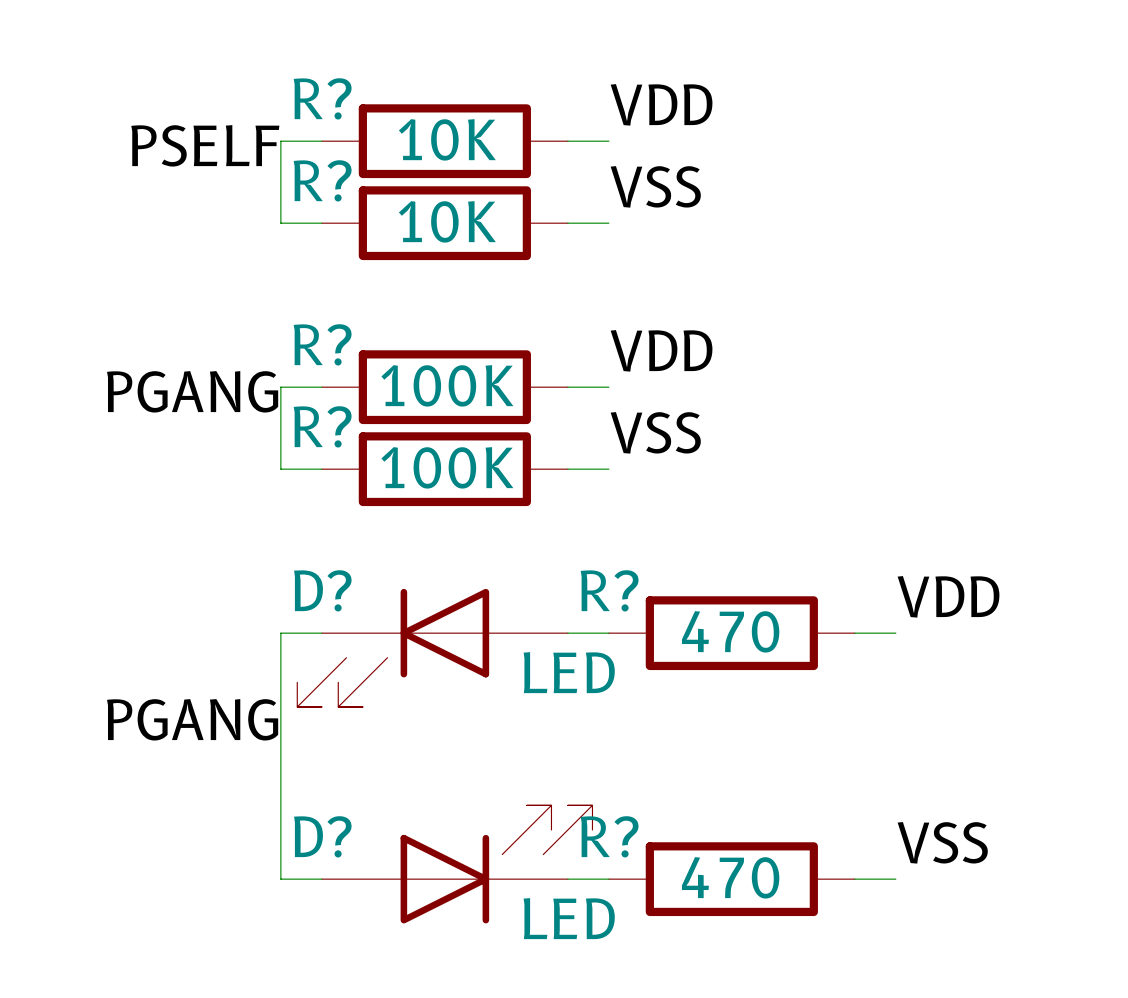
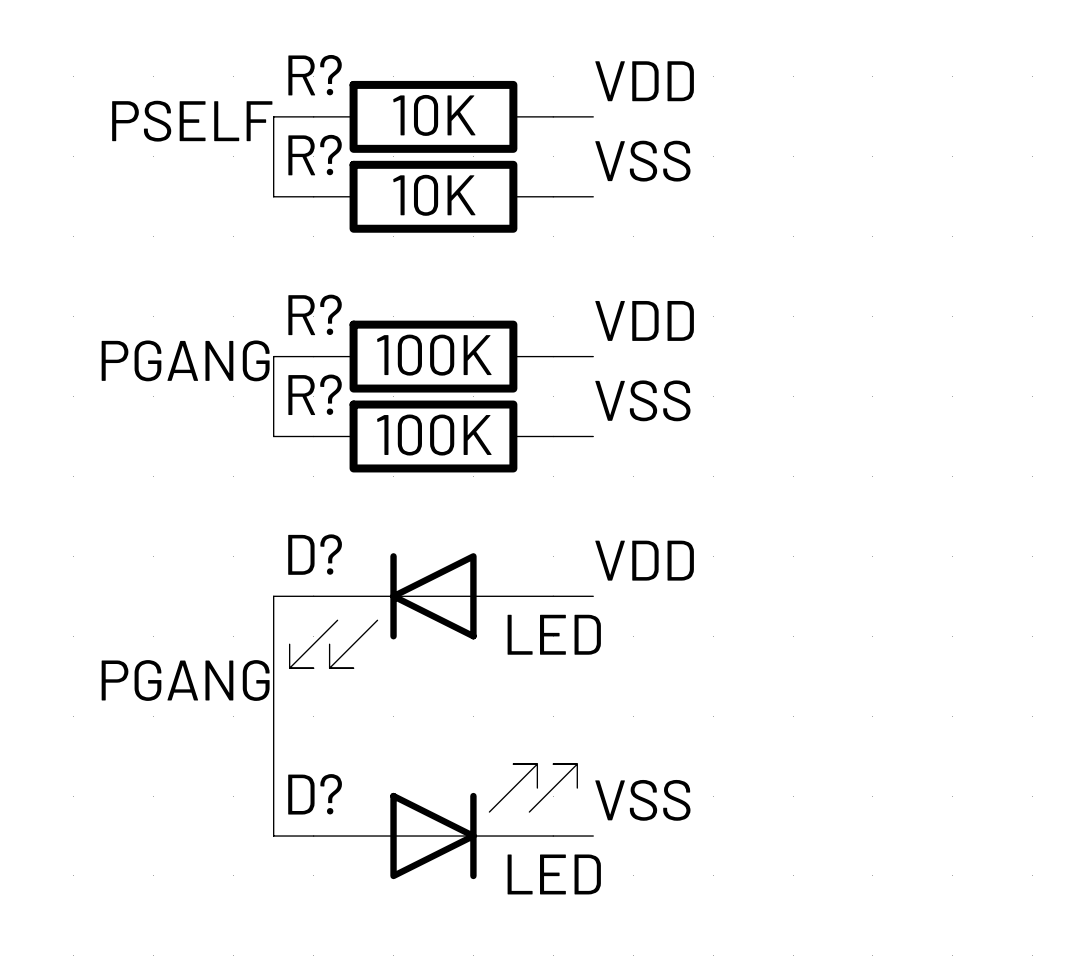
label position: VDD (948, 596) -> VDD (644, 560)
R?: 470 (731, 633) -> none
wire: (854, 633) (895, 633) -> none
label position: VSS (942, 842) -> VSS (642, 800)
R?: 470 (731, 879) -> none
wire: (854, 879) (895, 879) -> none

